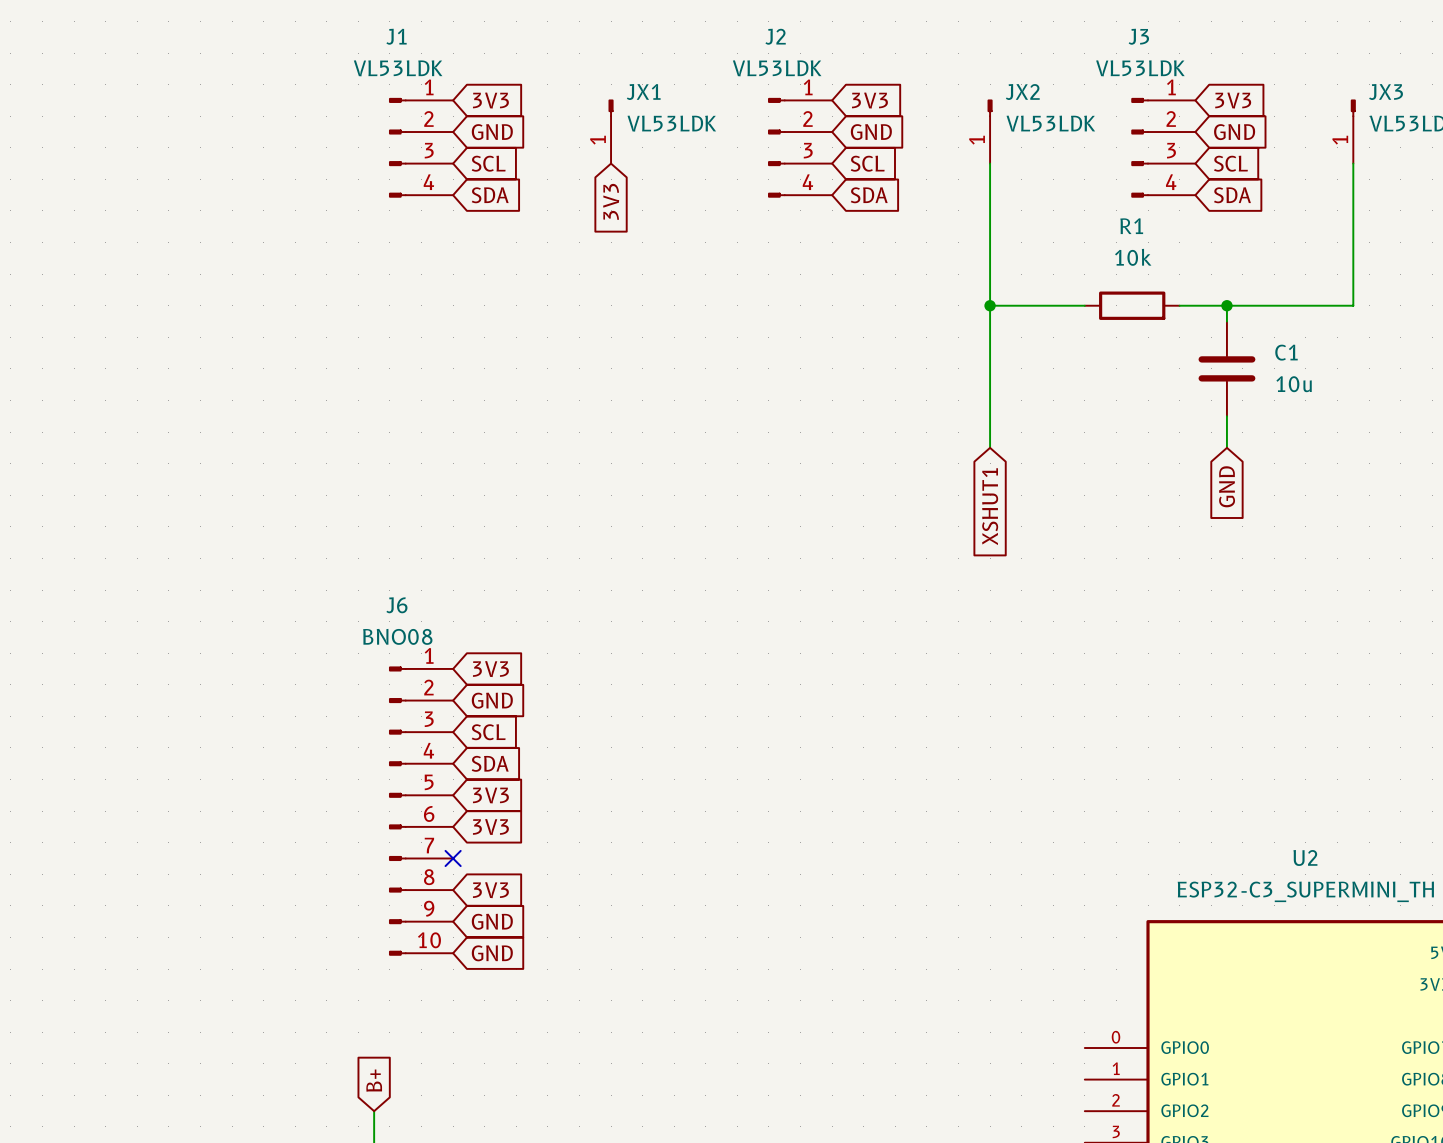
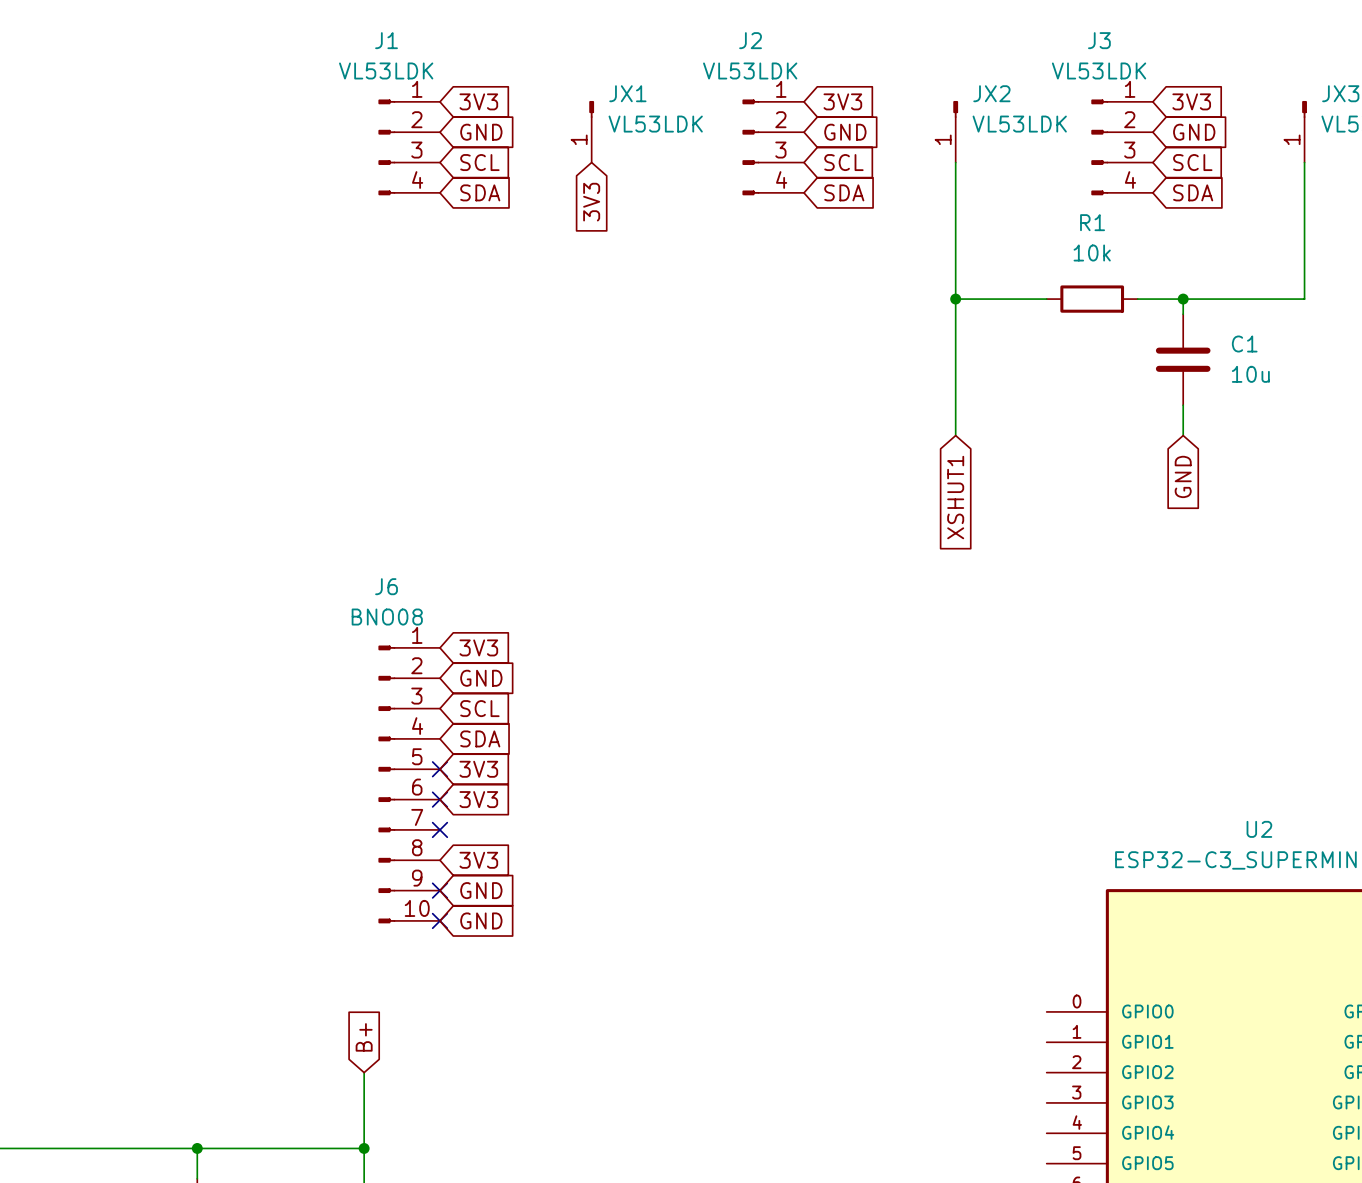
no-connect mark: none -> (439, 769)
no-connect mark: none -> (439, 799)
no-connect mark: none -> (439, 890)
no-connect mark: none -> (439, 920)

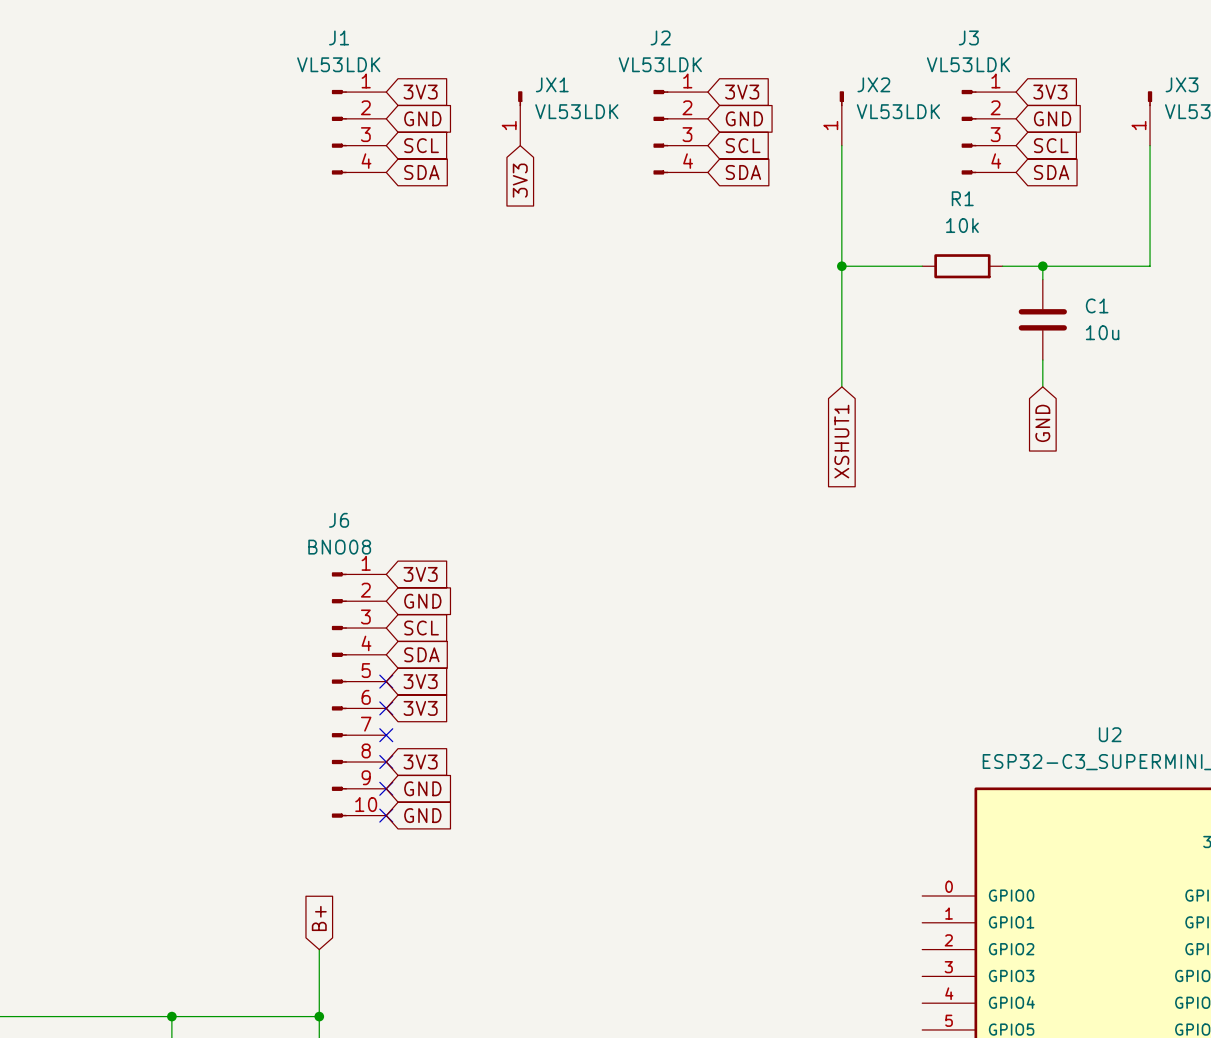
no-connect mark: none -> (386, 762)

